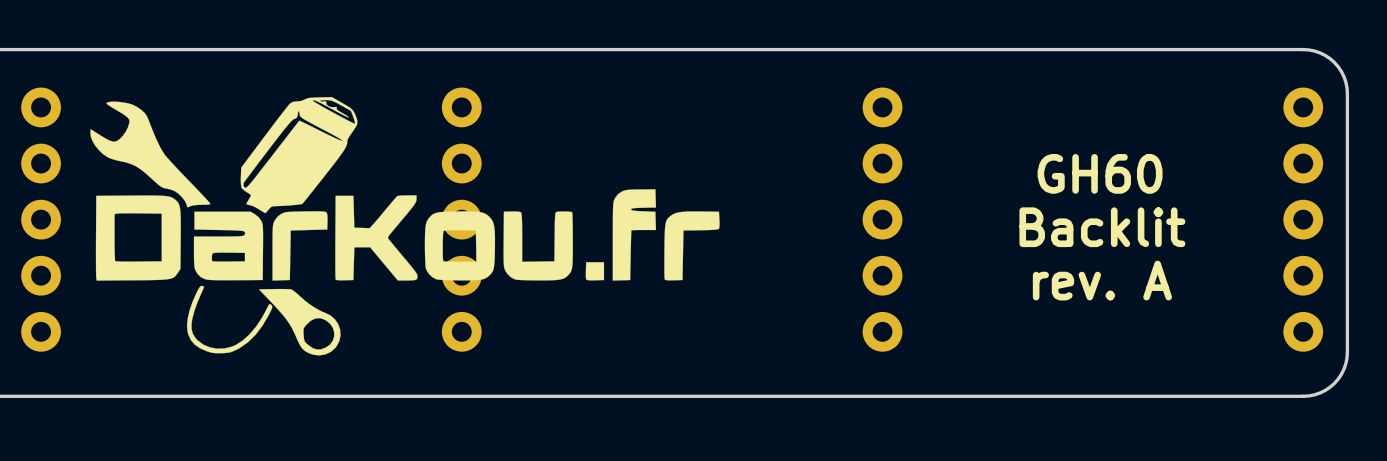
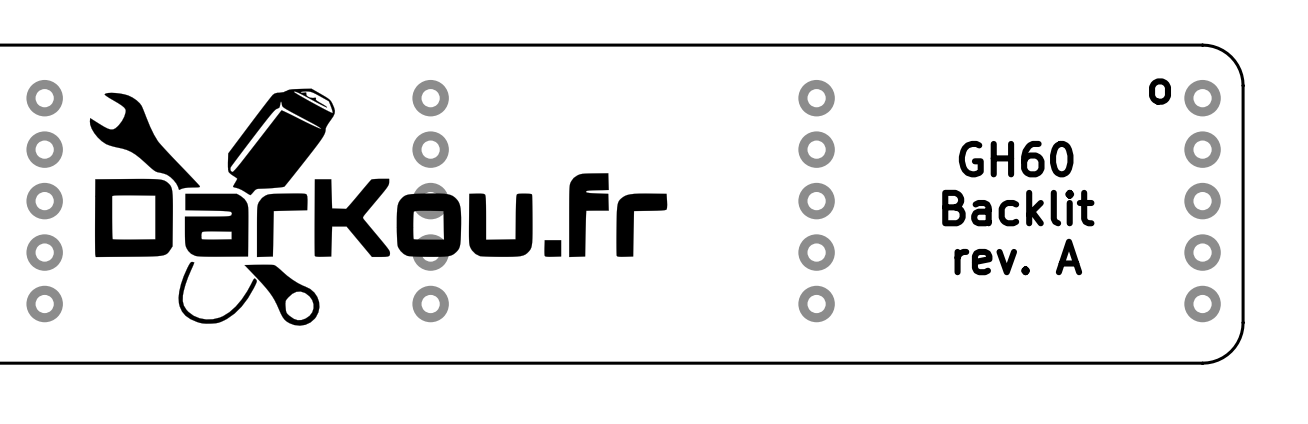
text: none -> o (1160, 91)

